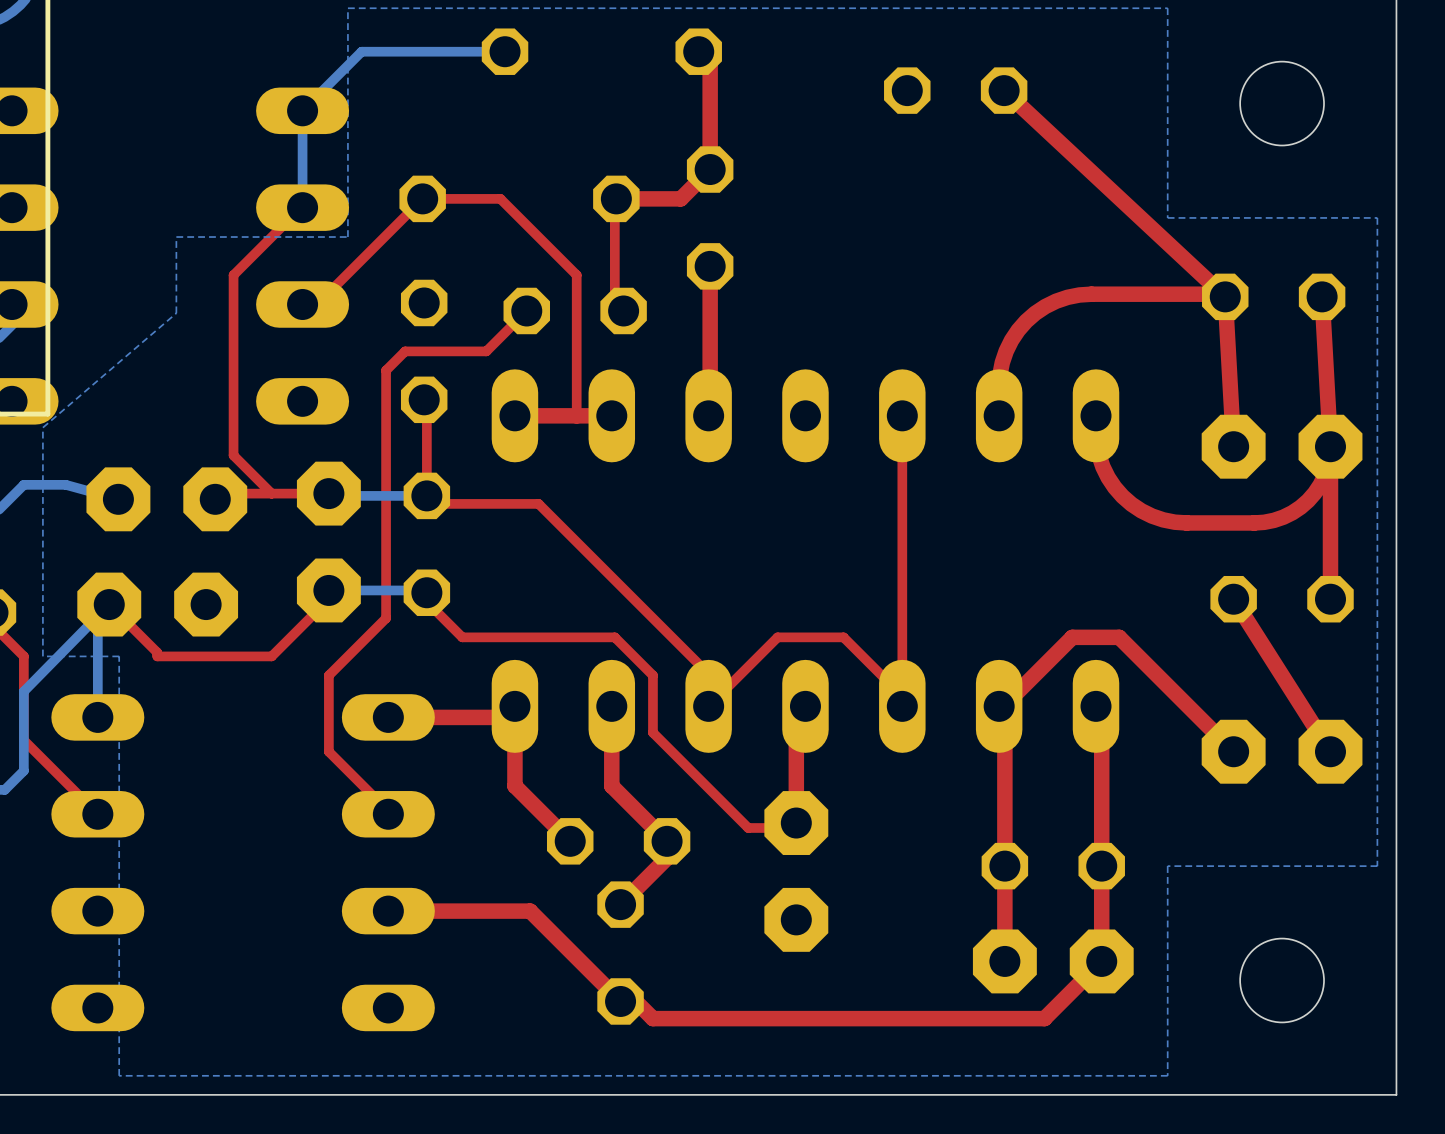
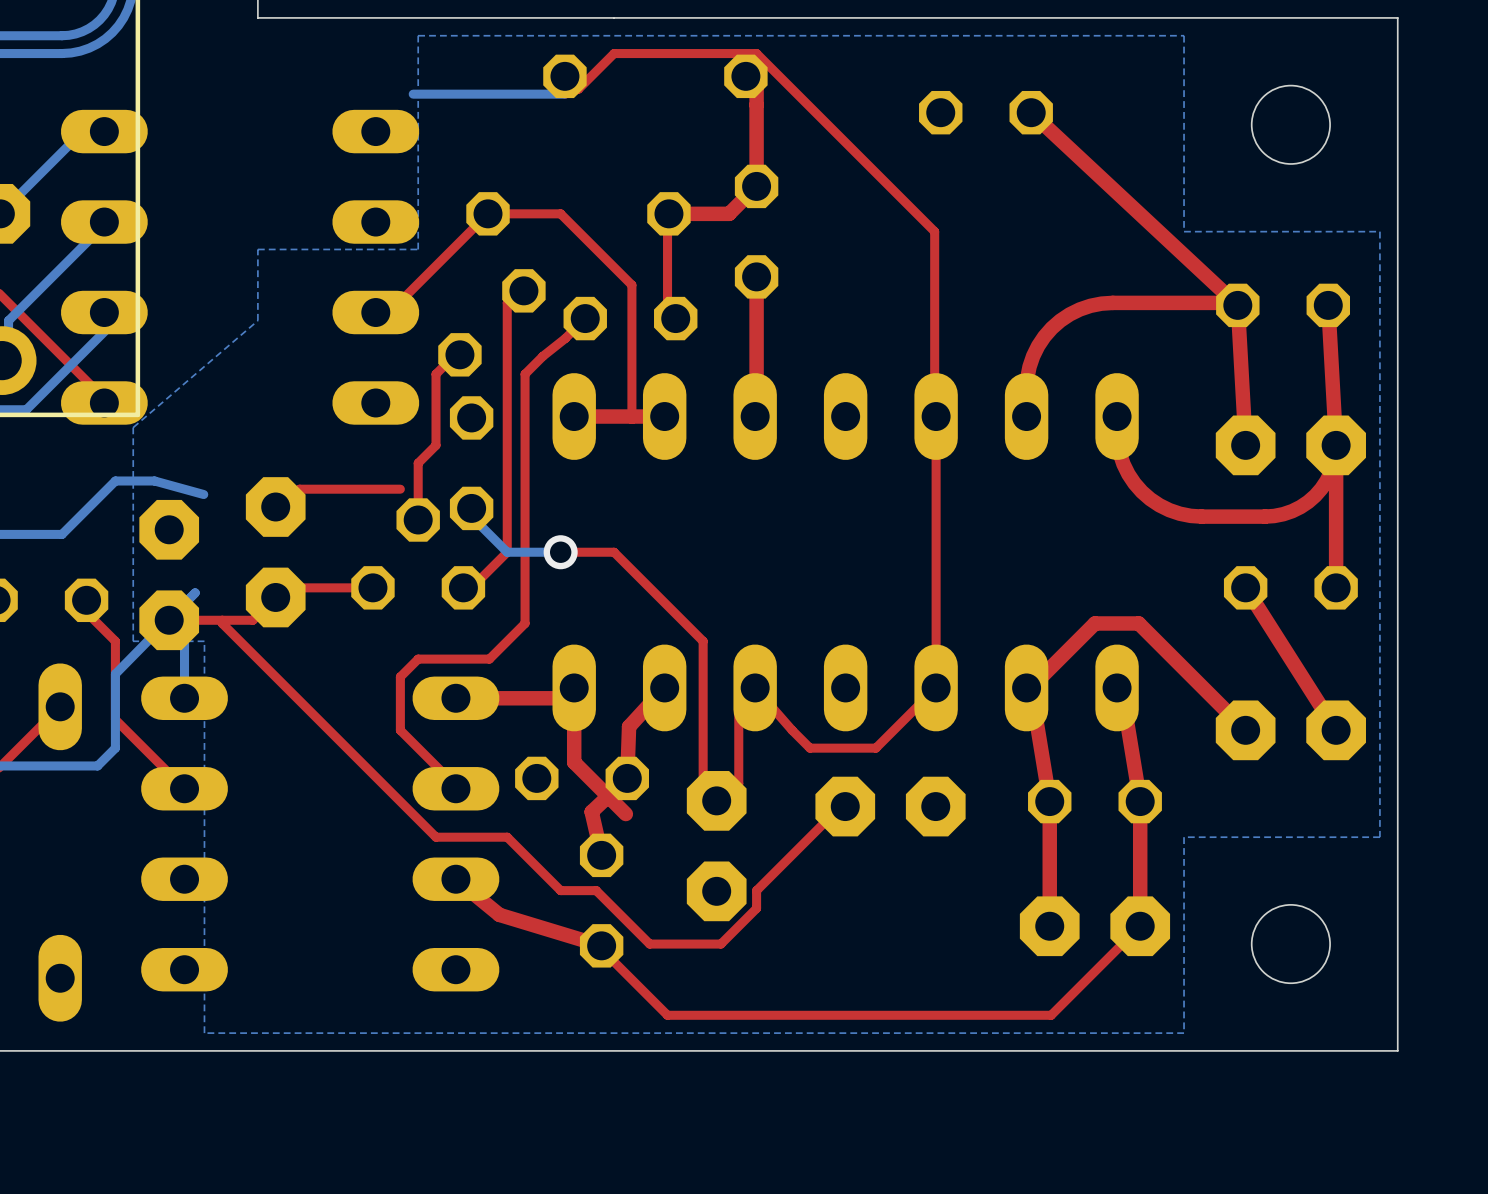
bottom track: (505, 51) (361, 51) (302, 110) (302, 207) -> none
top track: none -> (564, 94) (578, 89) (614, 53) (756, 53) (934, 231) (936, 416)
bottom track: none -> (564, 94) (413, 94)
top track: (302, 207) (233, 275) (233, 455) (271, 493) -> none
top track: none -> (523, 290) (507, 302) (507, 552) (471, 587) (463, 587)
top track: (505, 332) (486, 351) (405, 351) (386, 370) (386, 618) (328, 675) (328, 694) -> (565, 338) (542, 356) (525, 374) (525, 623) (489, 659) (418, 659) (400, 676)
top track: none -> (459, 354) (453, 356) (436, 374) (436, 445) (418, 463) (418, 520)
part rotation: 0° (424, 351) -> 45° clockwise (491, 322)
top track: (424, 399) (426, 402) (426, 495) (434, 503) (538, 503) (708, 673) (708, 706) (777, 637) (843, 637) (902, 696) -> none
part footprint: [296, 461, 361, 623] -> [351, 498, 486, 610]
bottom track: (328, 493) (331, 495) (426, 495) -> none
part: (166, 499) -> none
bottom track: none -> (471, 508) (471, 516) (507, 552) (560, 552)
part position: (426, 544) -> (471, 463)
part: none -> (275, 552)
via: none -> (560, 552)
part: none -> (169, 575)
top track: (328, 590) (328, 599) (271, 656) (157, 656) (157, 652) (109, 604) -> none
bottom track: (328, 590) (424, 590) (426, 592) -> none
top track: (426, 592) (424, 599) (462, 637) (614, 637) (652, 675) -> (560, 552) (614, 552) (703, 641) (703, 659)
top track: none -> (372, 587) (275, 587) (275, 597) (252, 620) (169, 620)
part: (157, 604) -> none
top track: none -> (222, 620) (222, 623) (436, 837) (507, 837) (560, 890) (596, 890) (649, 944) (720, 944) (756, 908) (756, 890) (827, 819) (845, 806)
top track: (805, 694) (805, 706) (796, 715) (796, 823) (791, 827) (748, 827) (652, 732) -> (936, 687) (875, 748) (810, 748) (755, 687) (738, 704) (738, 783) (716, 805) (716, 800) (703, 783) (703, 712)
top track: (611, 706) (611, 786) (667, 841) (667, 858) (620, 904) -> (664, 687) (629, 726) (627, 778) (591, 811) (601, 855)
top track: (1004, 712) (1004, 961) -> (1031, 693) (1049, 801) (1049, 926)
top track: (1101, 712) (1101, 961) (1044, 1018) (652, 1018) (635, 1001) (620, 1001) (530, 911) (388, 911) -> (1122, 693) (1140, 801) (1140, 926) (1051, 1015) (667, 1015) (614, 961) (601, 945) (499, 914) (455, 879)
part: none -> (582, 778)
part: none -> (890, 806)
part: (618, 841) -> none
part position: (1053, 866) -> (1094, 801)
part: (796, 871) -> none
part: none -> (716, 846)
part: none -> (601, 900)
part: (620, 953) -> none
part position: (1053, 961) -> (1094, 926)

